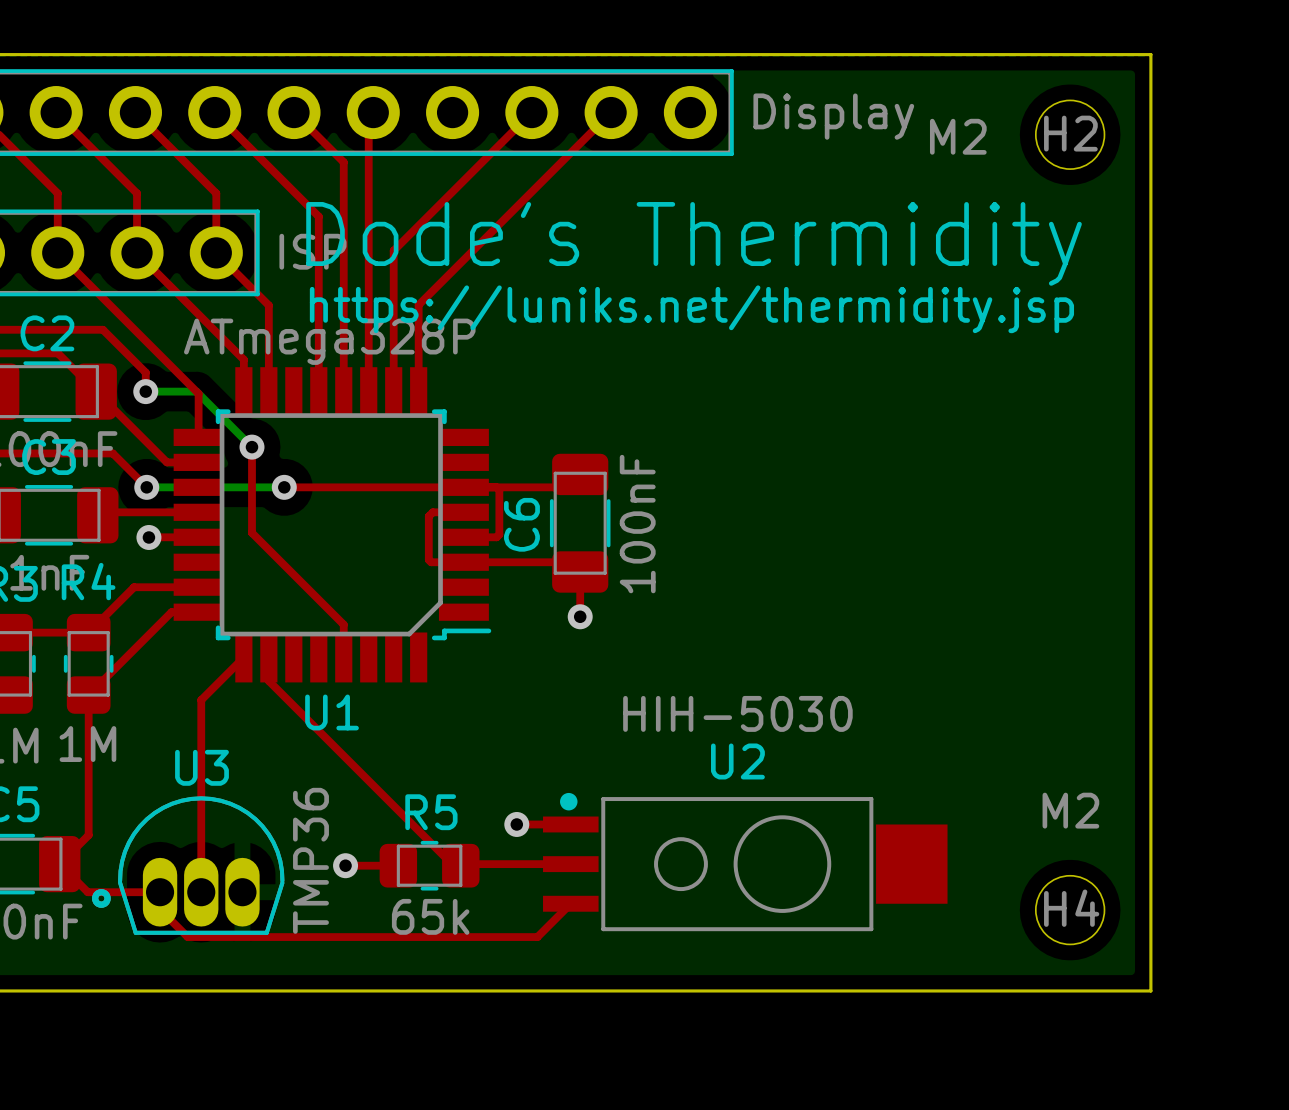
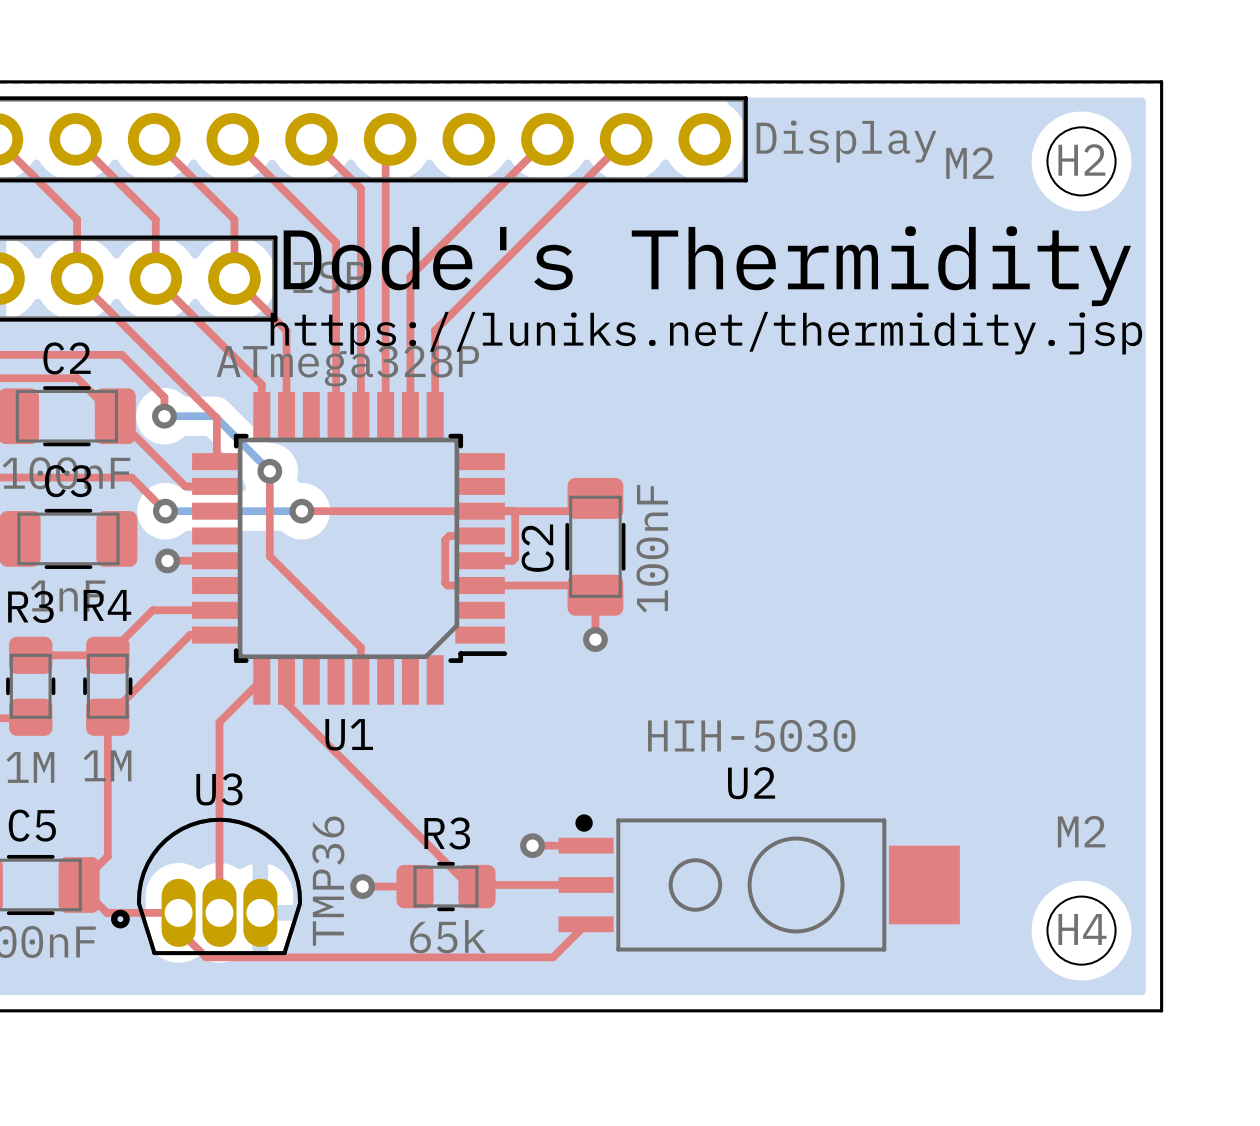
top track: (198, 512) (100, 512) (97, 515) -> none
C6 name: C6 (521, 524) -> C2 (537, 548)
R5 name: R5 (431, 812) -> R3 (447, 833)

